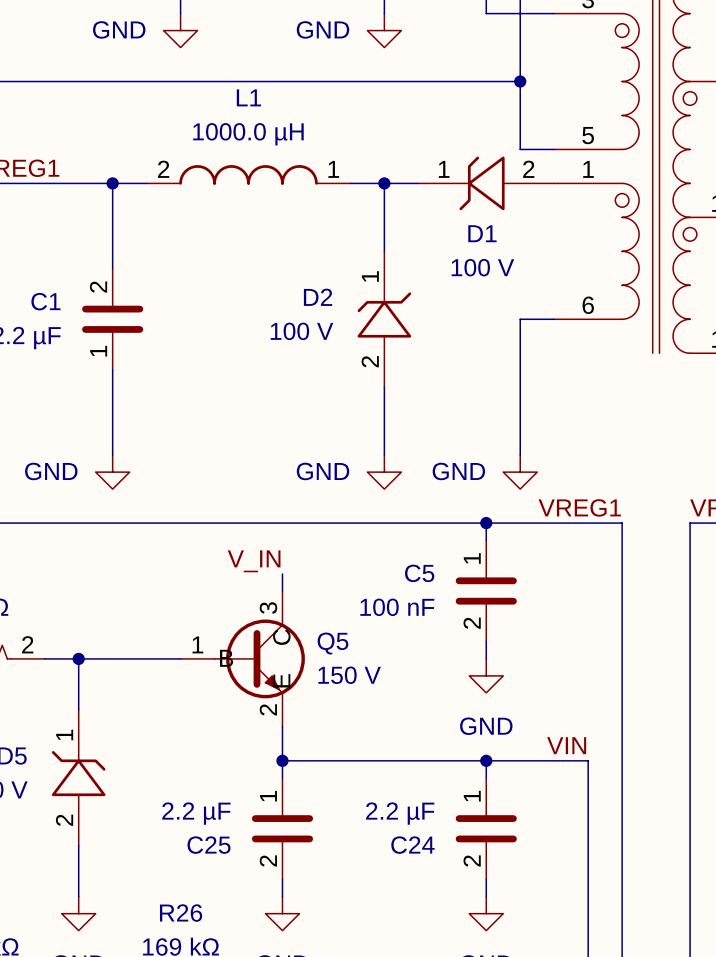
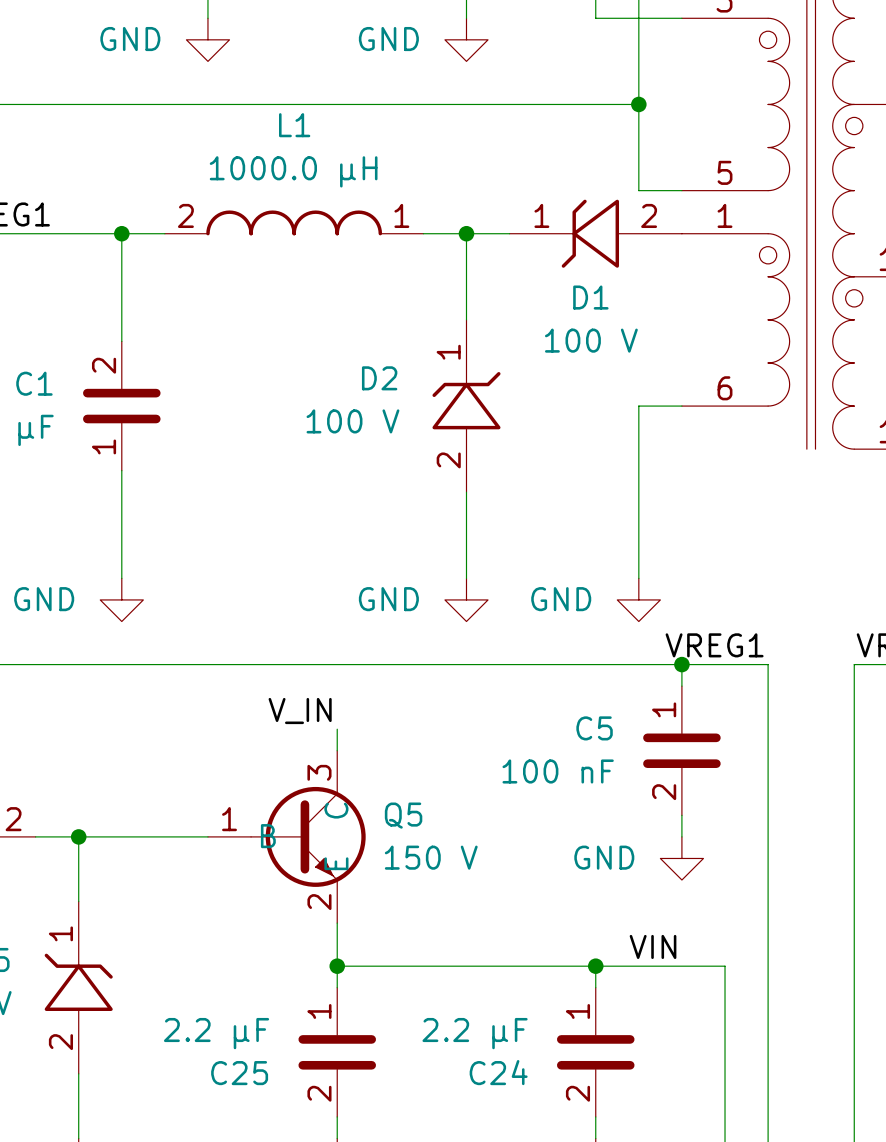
wire: (486, 523) (486, 540) -> (681, 664) (681, 686)
junction position: (486, 523) -> (681, 664)
C5 position: (486, 591) -> (681, 750)
wire: (486, 641) (486, 658) -> (681, 815) (681, 836)
power symbol position: GND (486, 675) -> GND (681, 858)
power symbol text position: GND (486, 726) -> GND (604, 857)
label position: VIN (566, 745) -> VIN (653, 946)

